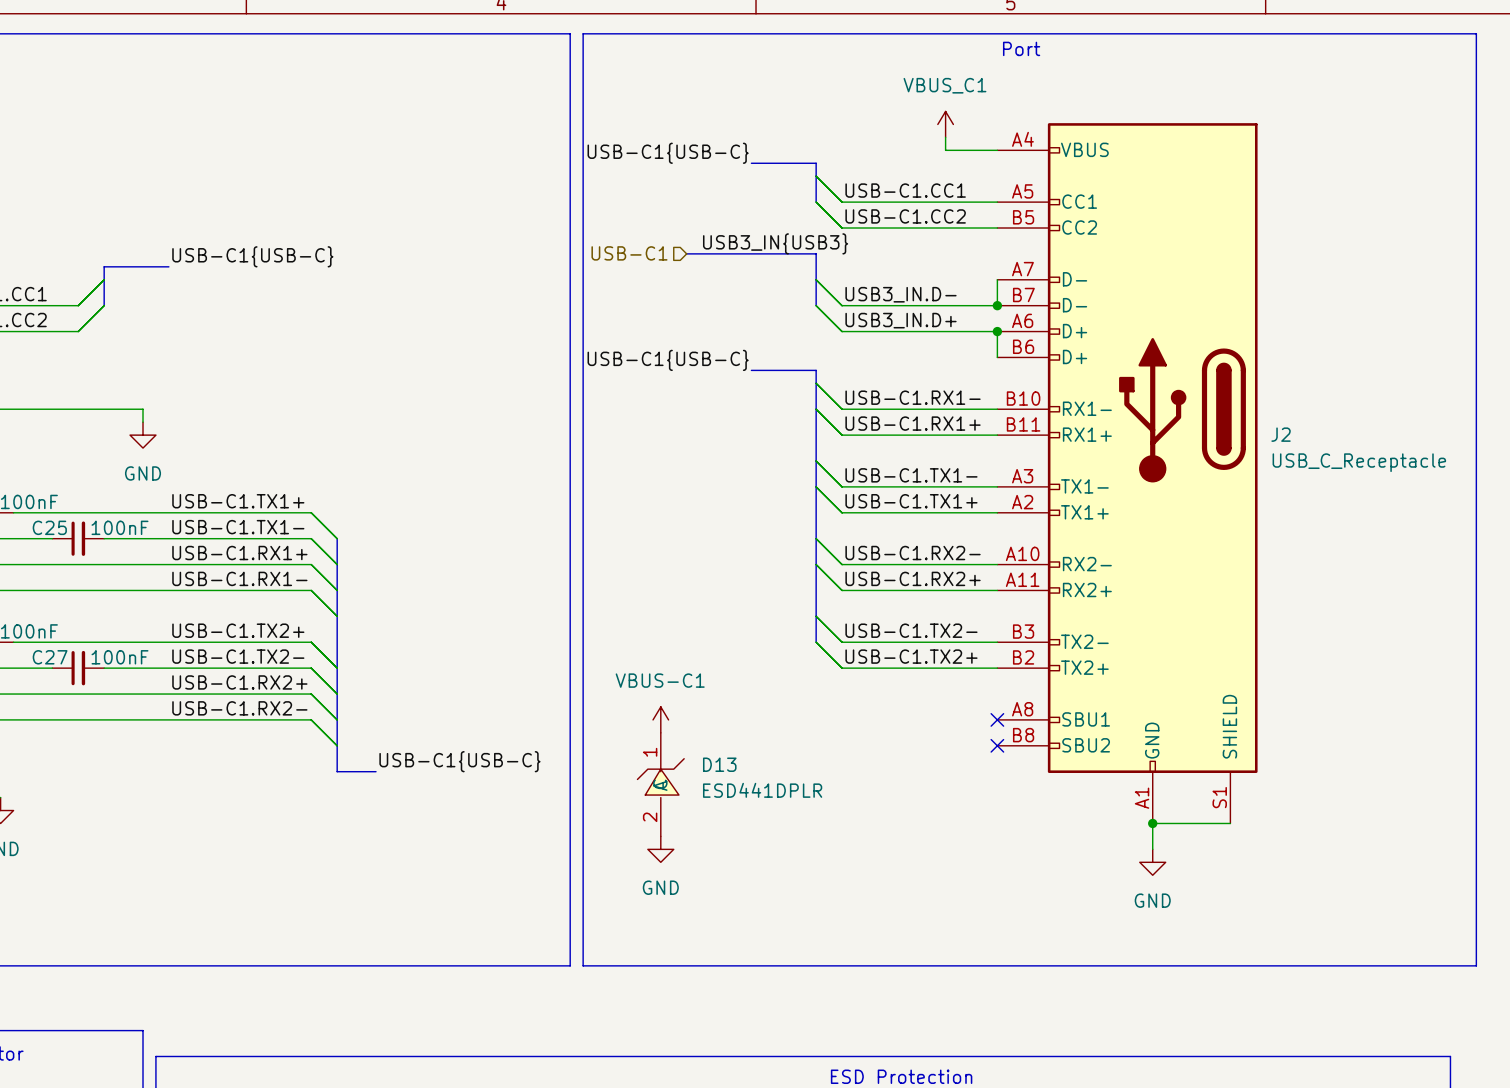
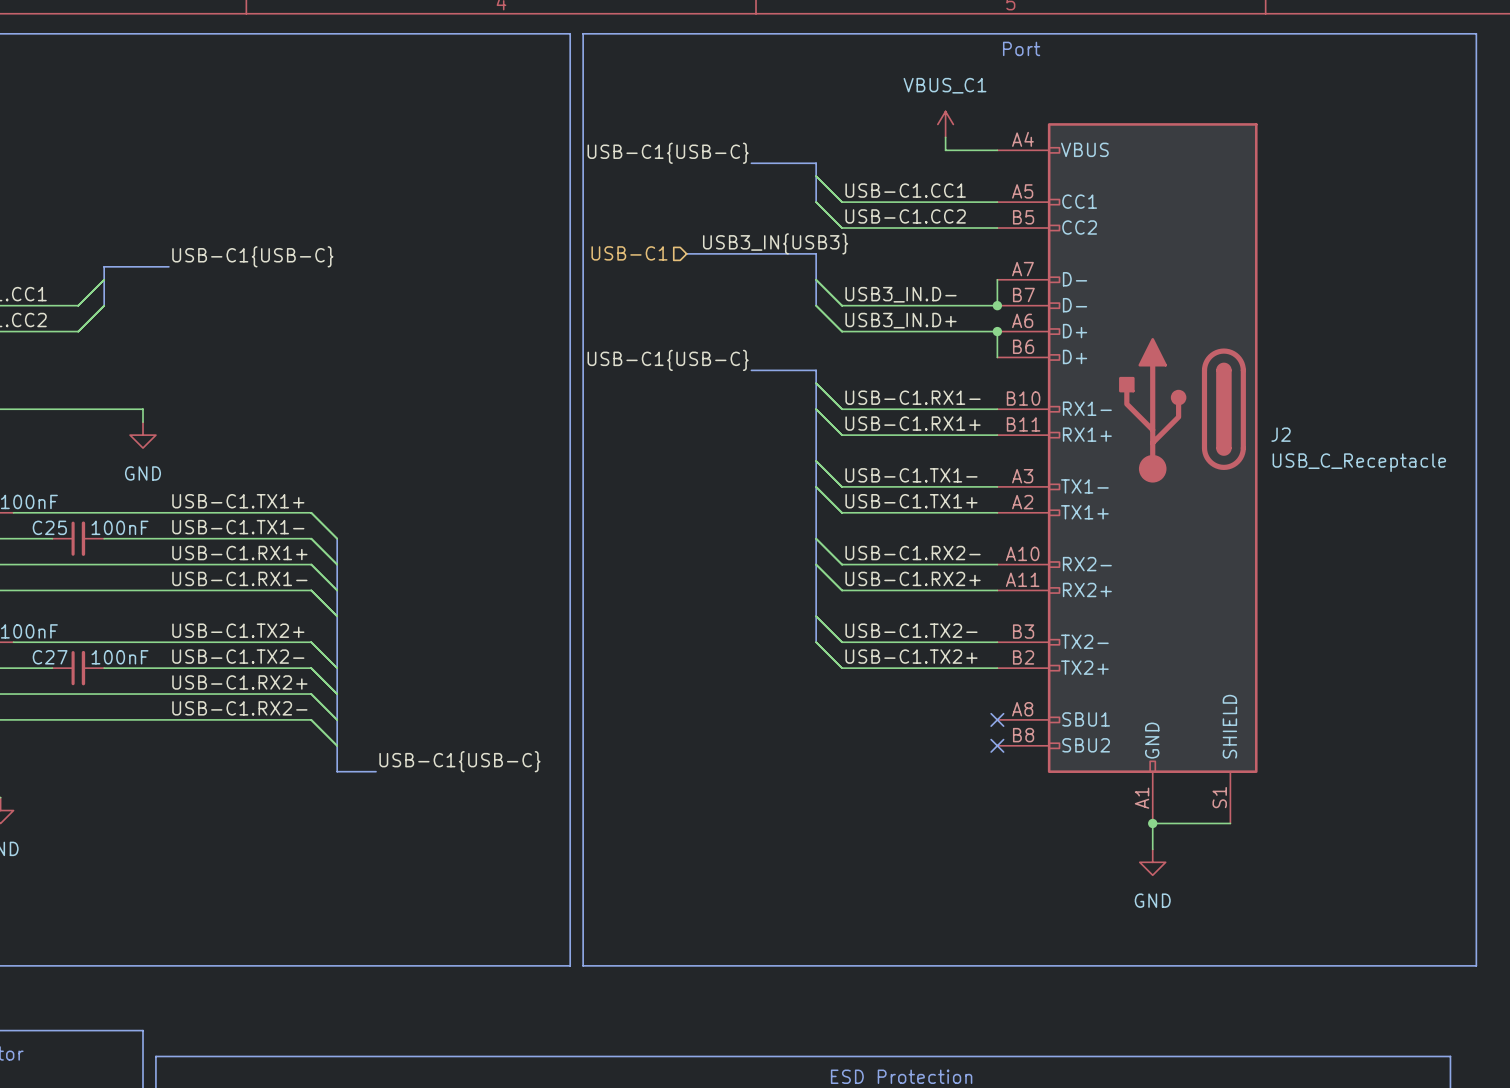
power symbol: VBUS-C1 (660, 719) -> none
D13: ESD441DPLR (660, 784) -> none
power symbol: GND (660, 849) -> none

